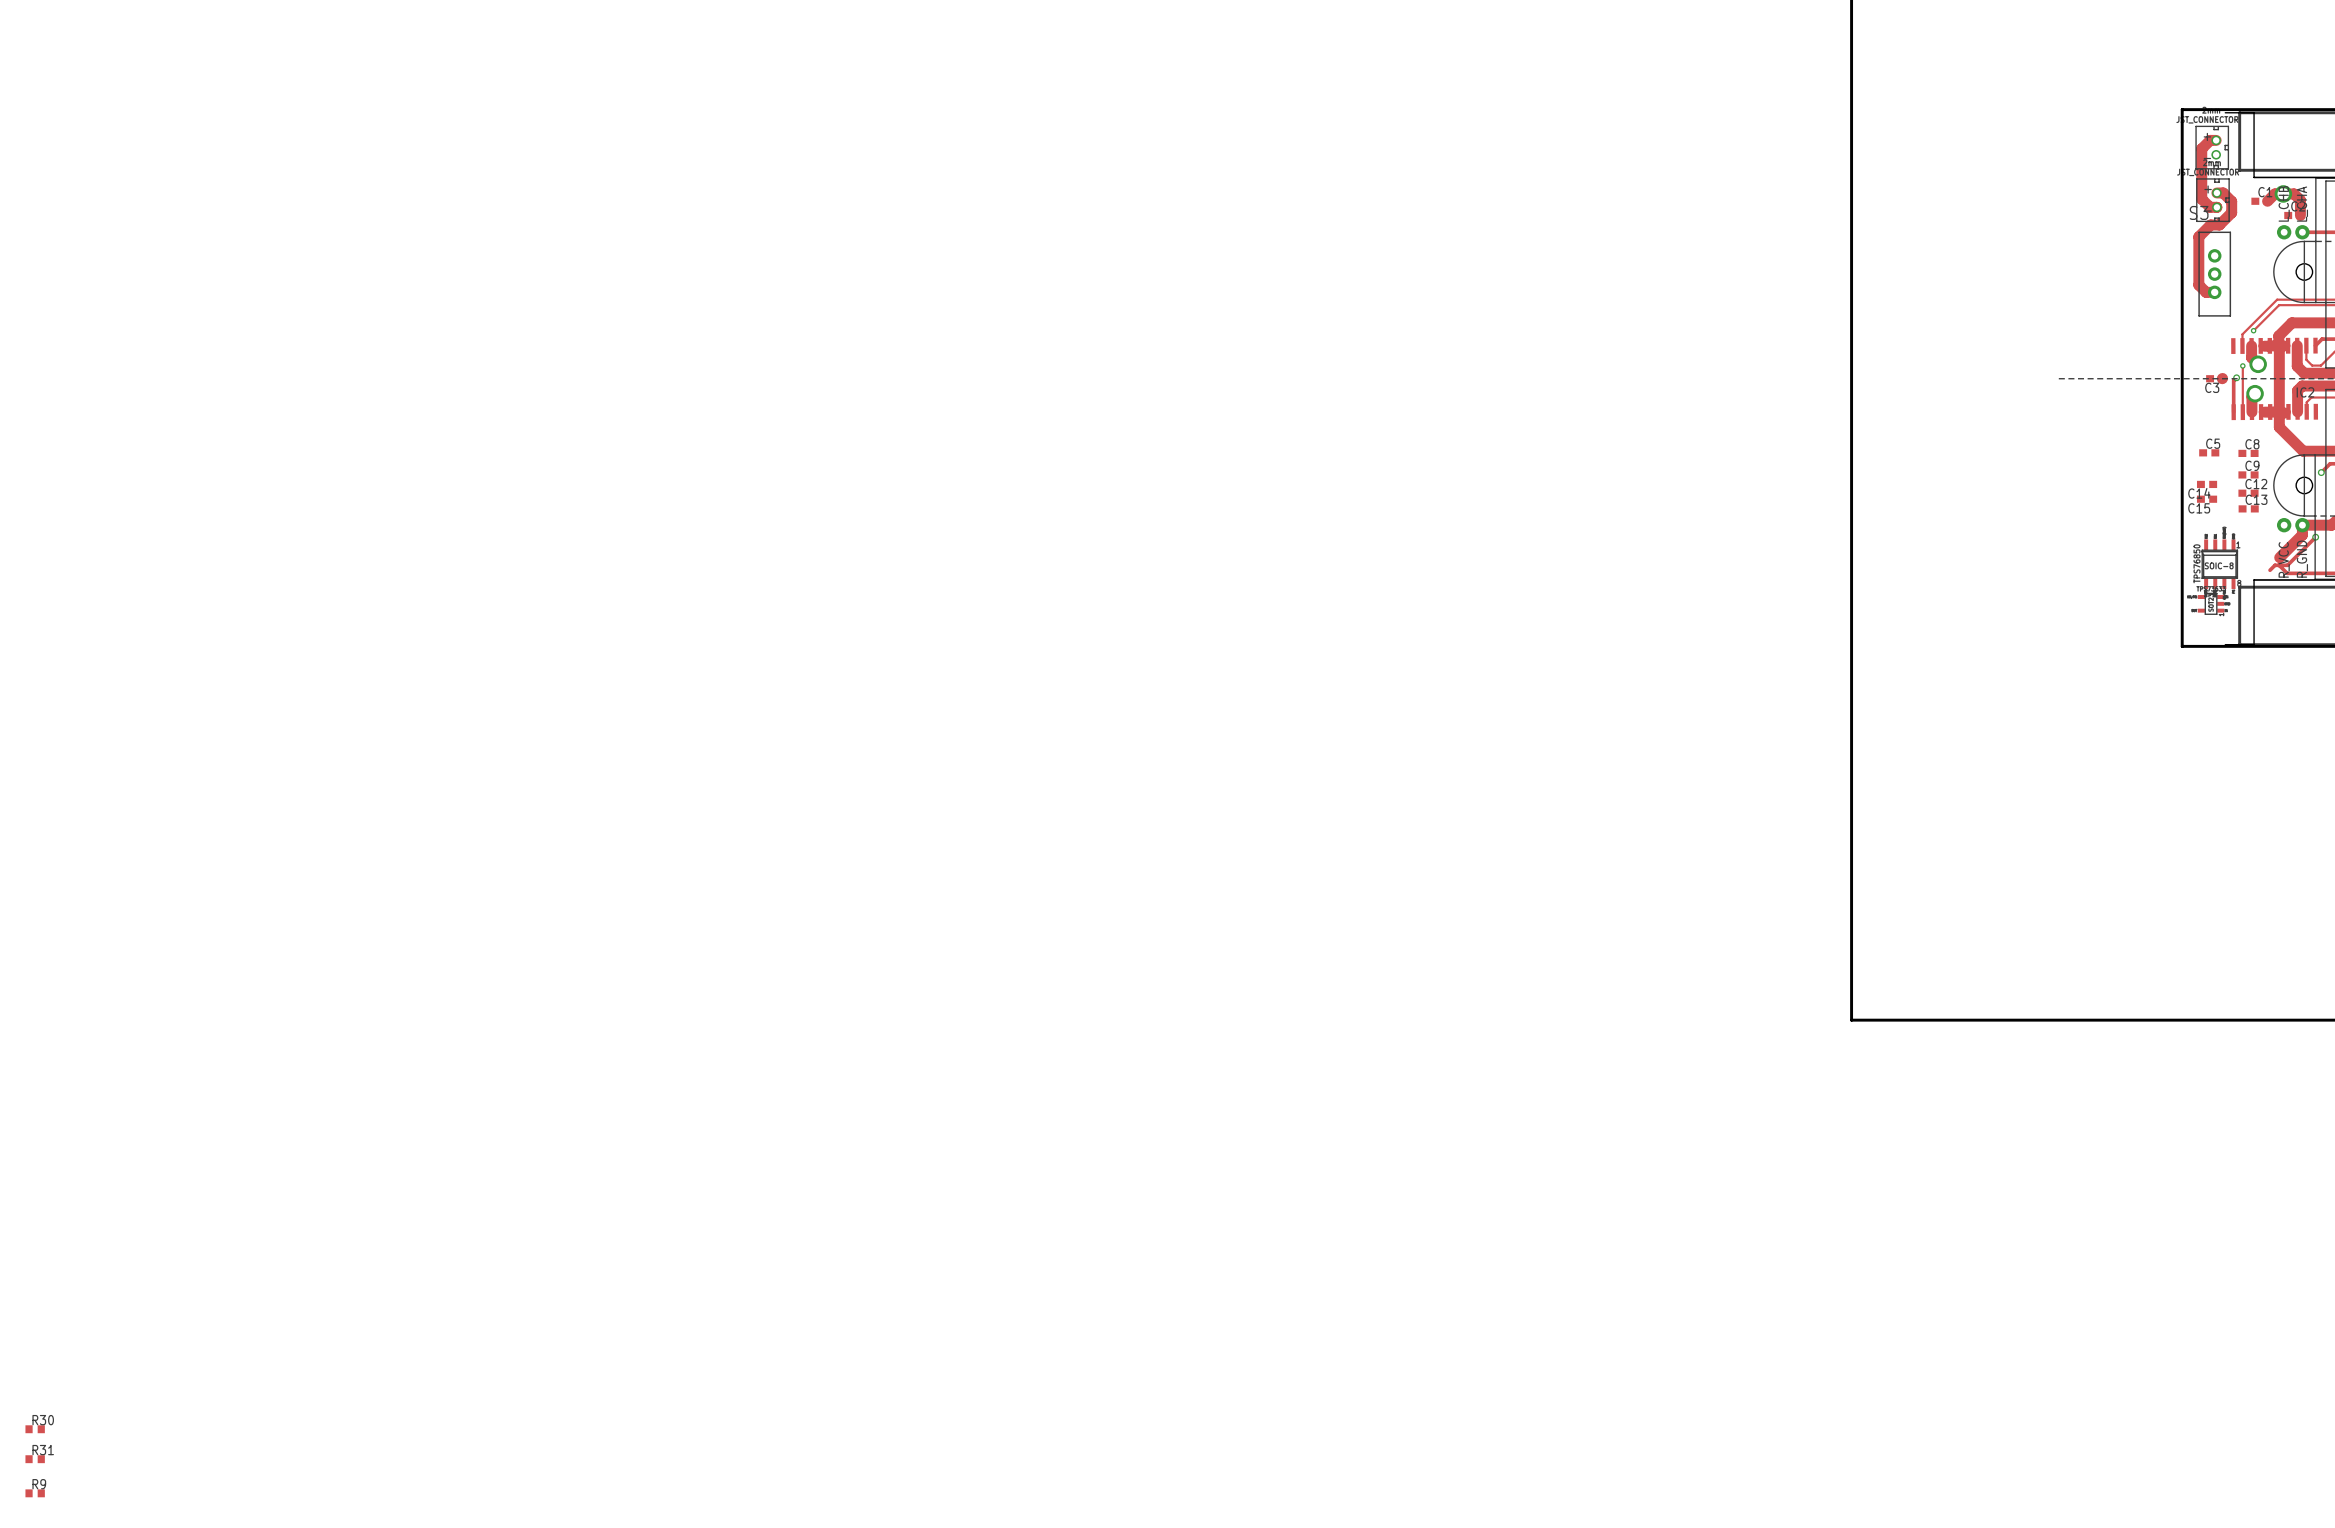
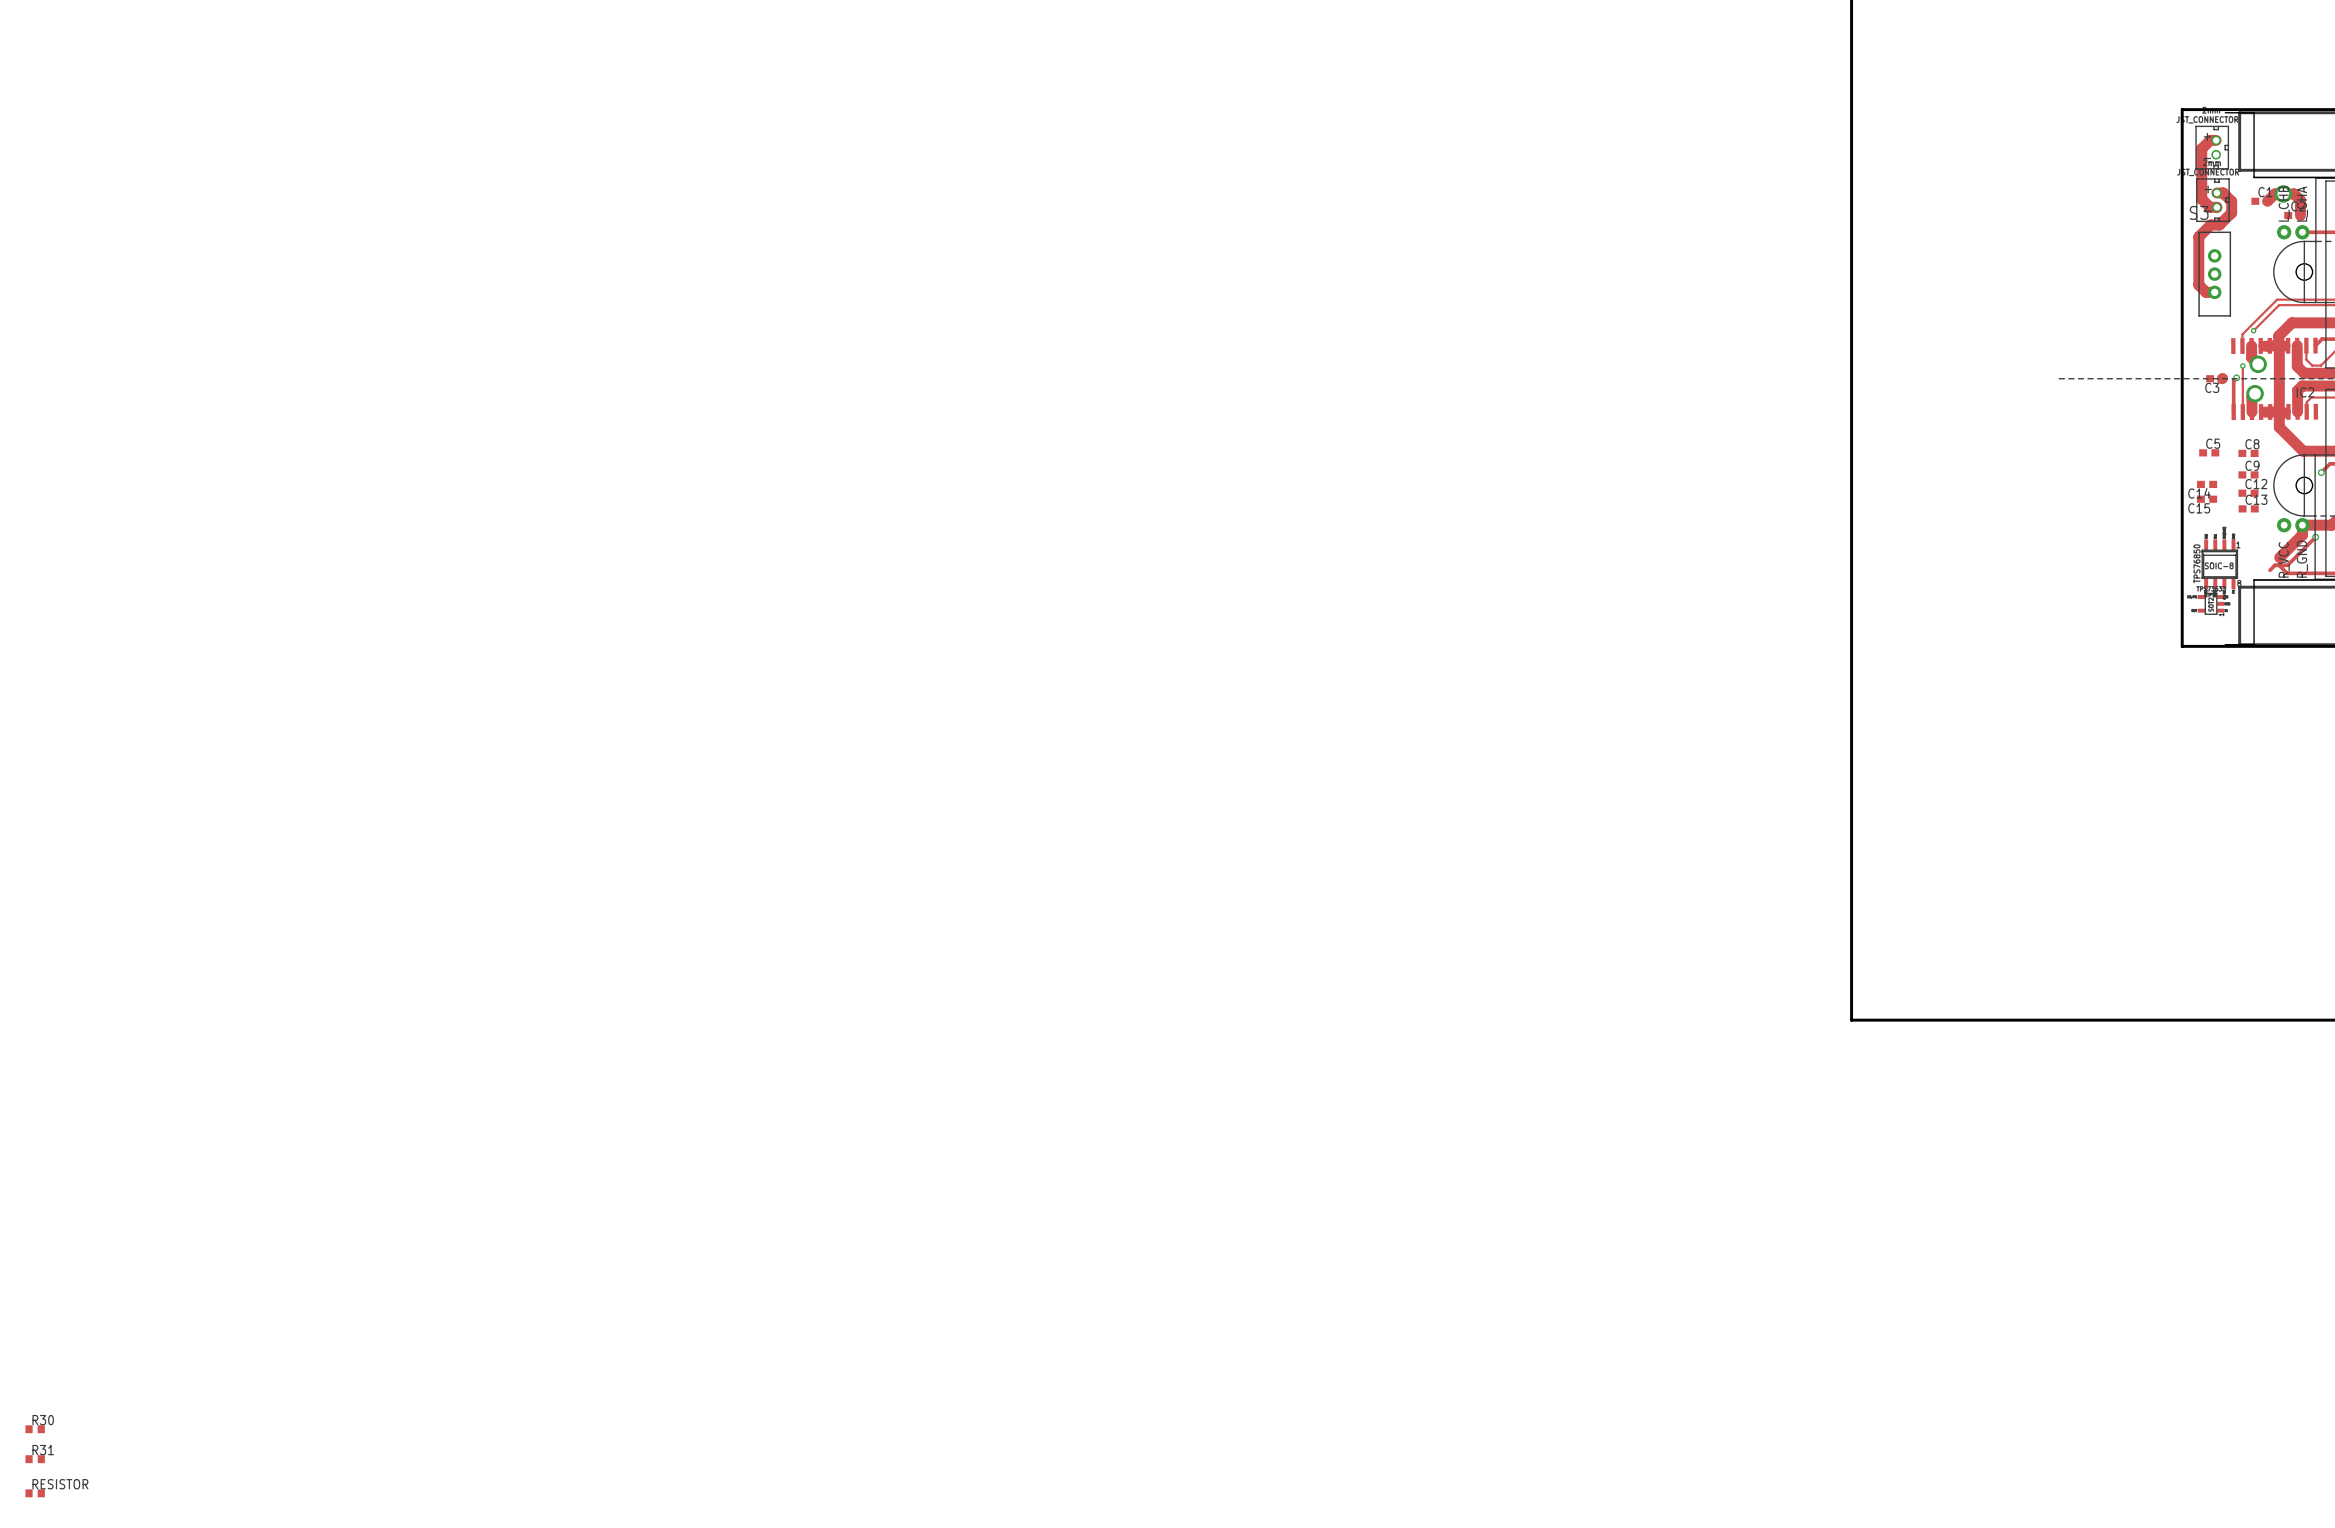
R9 name: R9 (39, 1484) -> RESISTOR (60, 1484)

